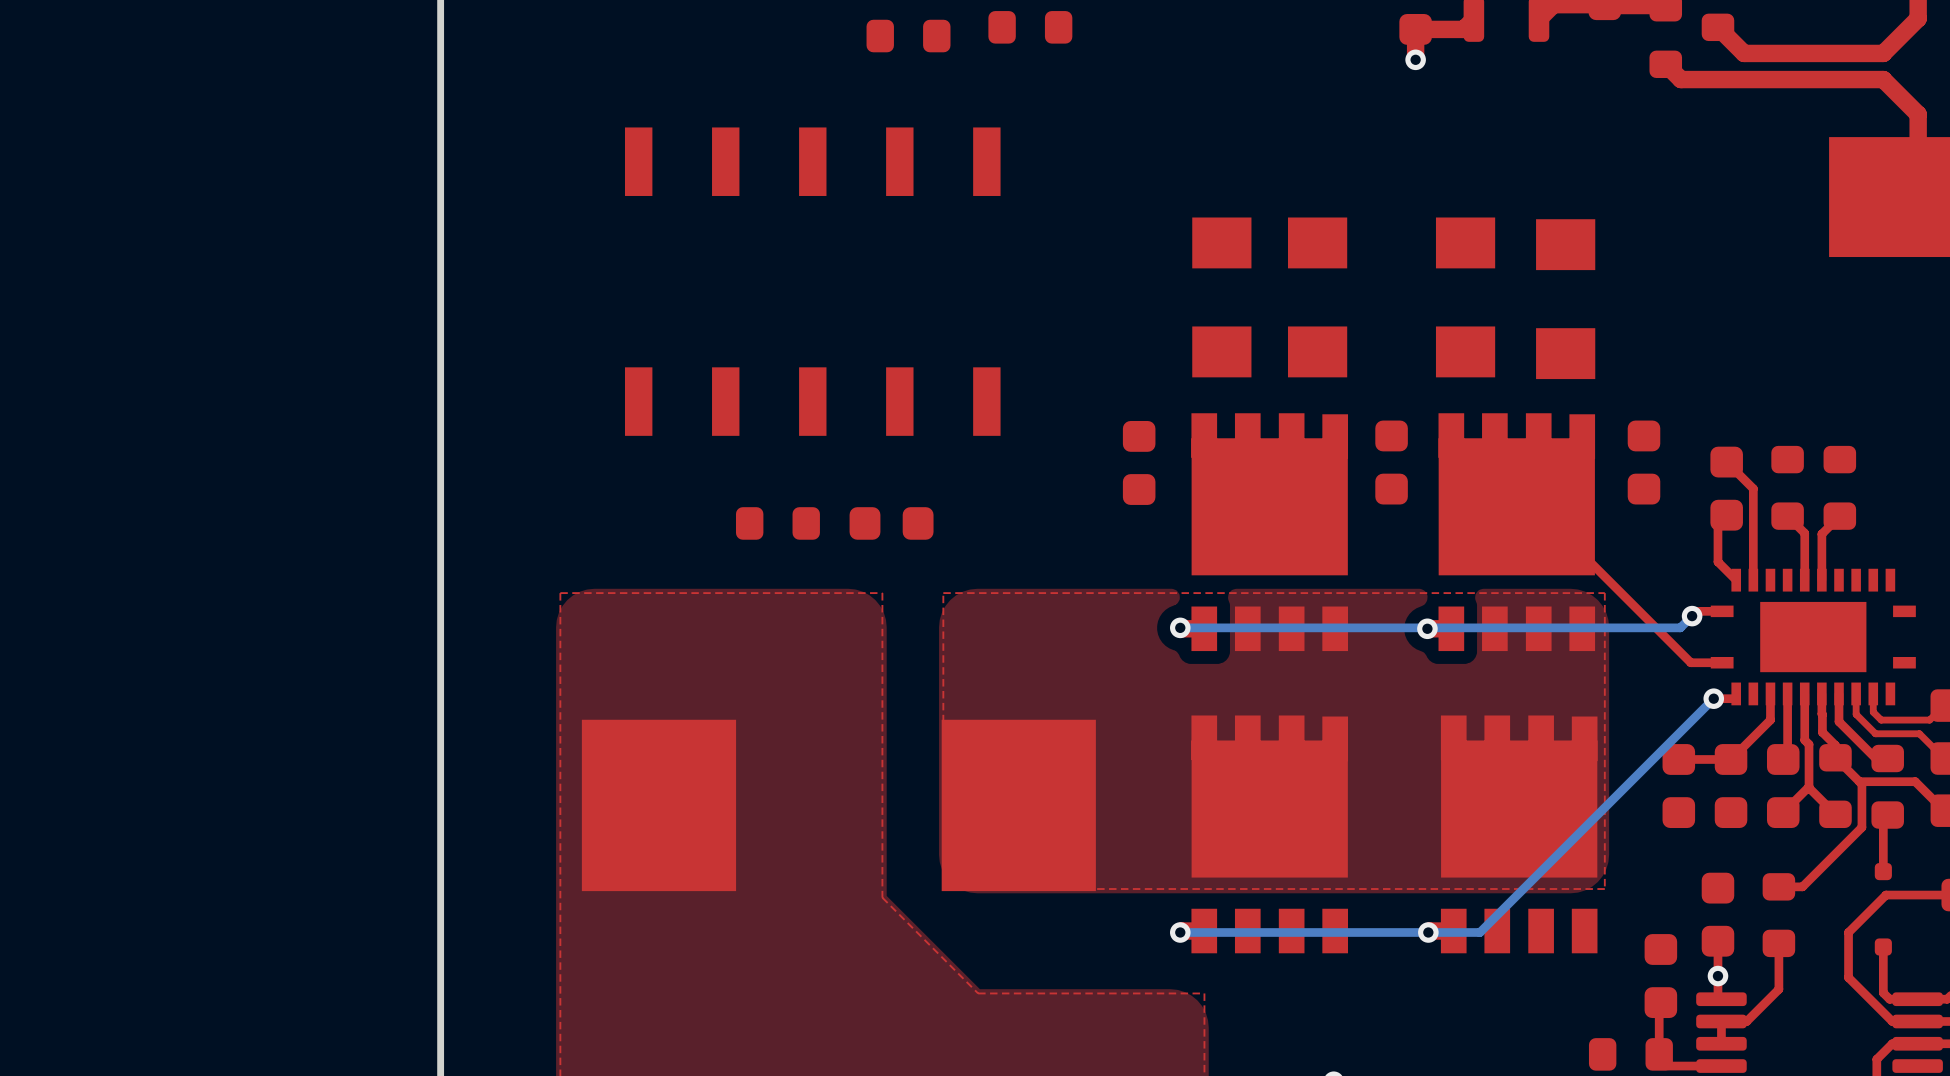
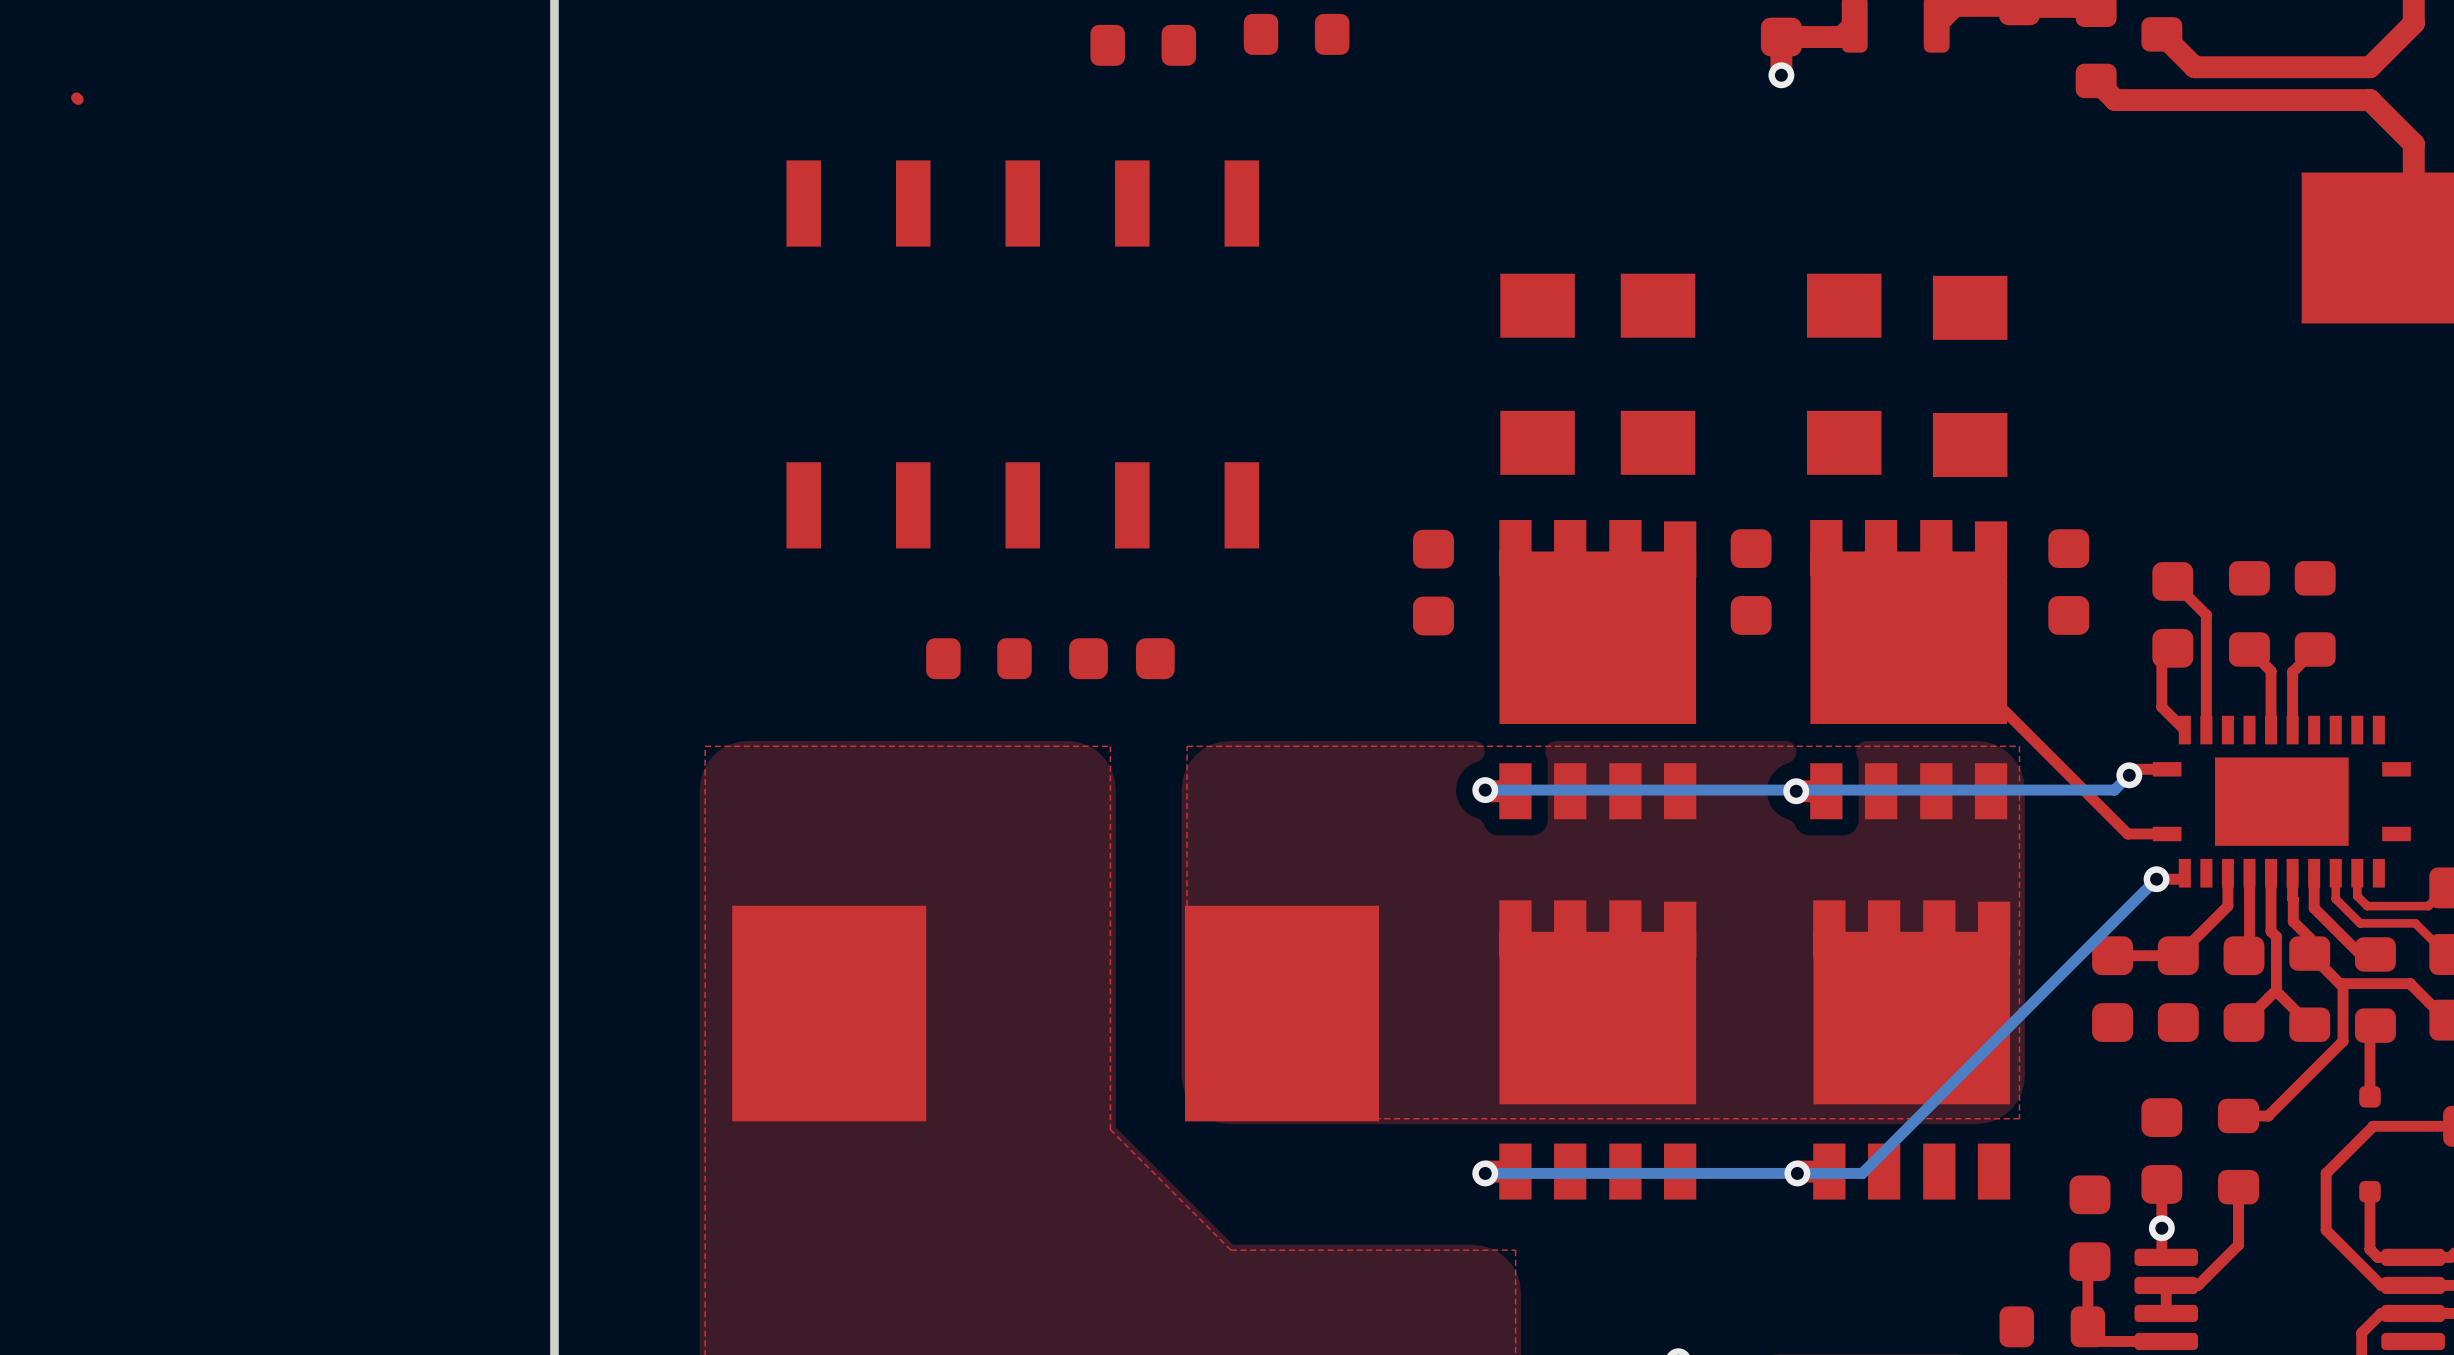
top track: none -> (76, 97) (78, 99)

